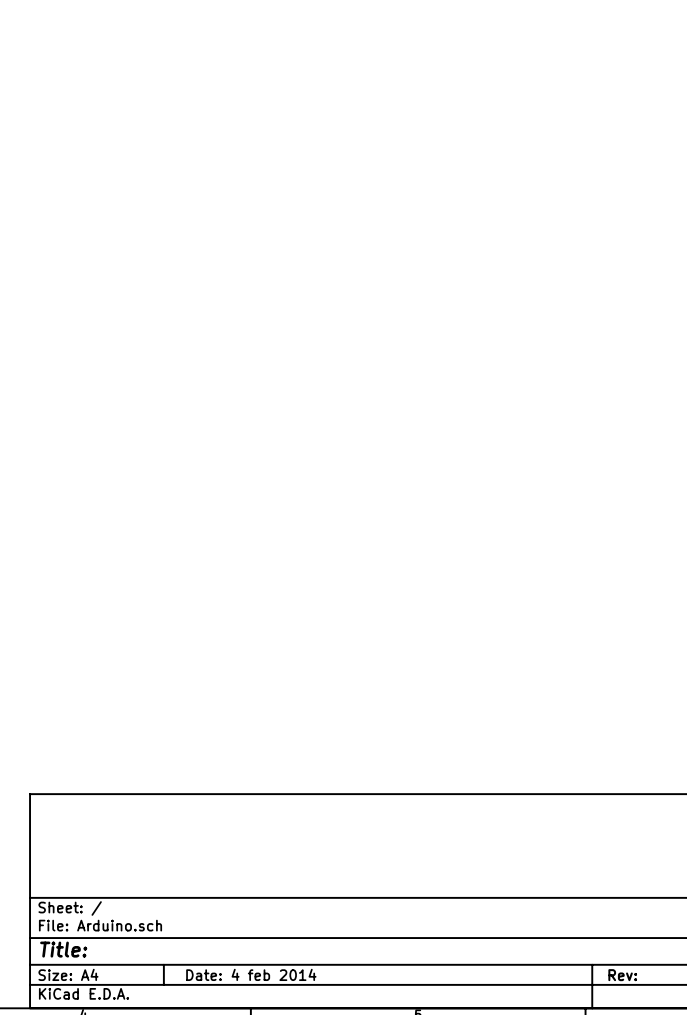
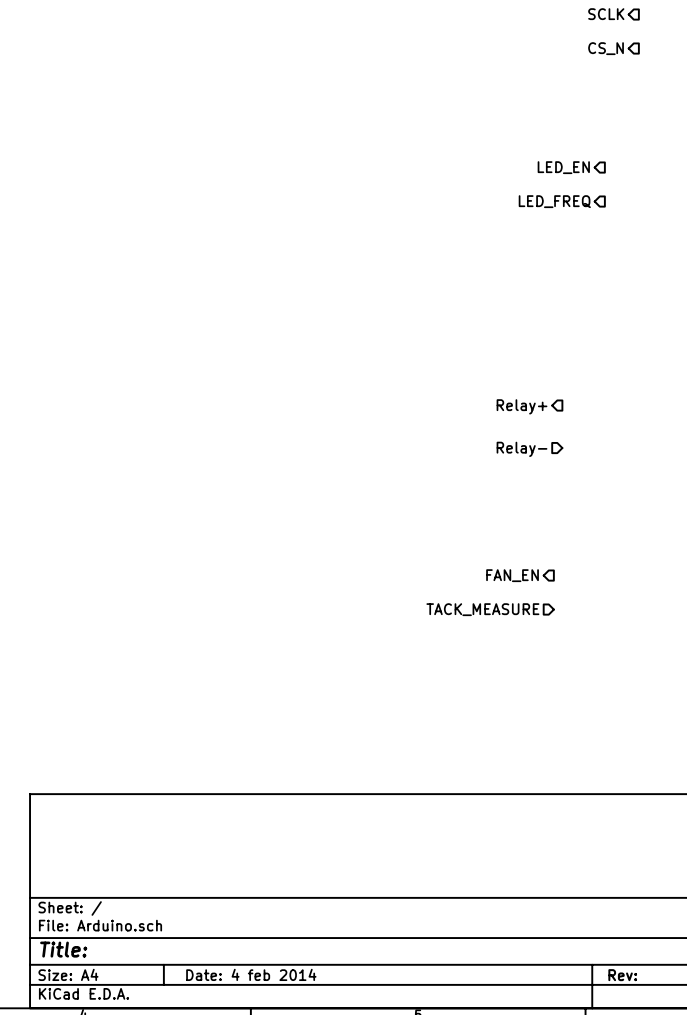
hierarchical label: none -> SCLK (606, 14)
hierarchical label: none -> CS_N (606, 48)
hierarchical label: none -> LED_EN (563, 167)
hierarchical label: none -> LED_FREQ (554, 201)
hierarchical label: none -> Relay+ (522, 406)
hierarchical label: none -> Relay- (522, 449)
hierarchical label: none -> FAN_EN (512, 575)
hierarchical label: none -> TACK_MEASURE (482, 609)

